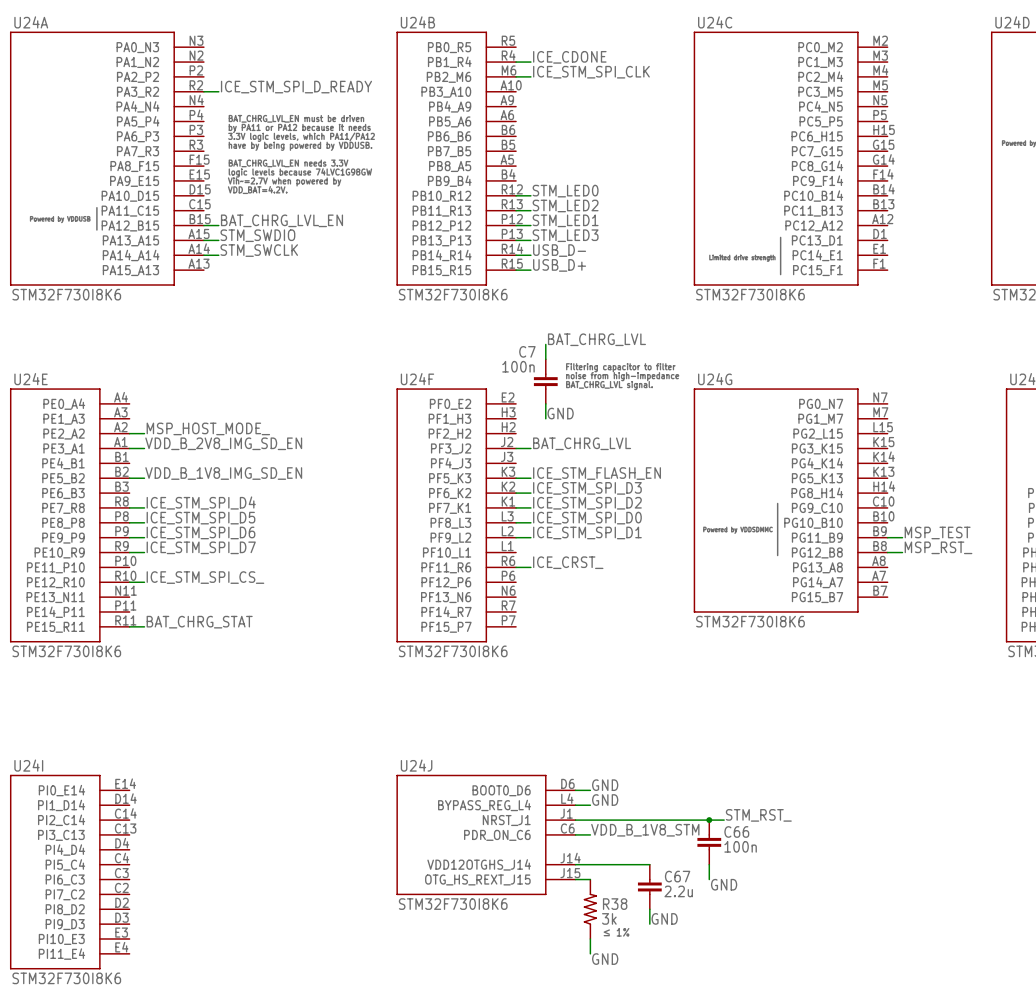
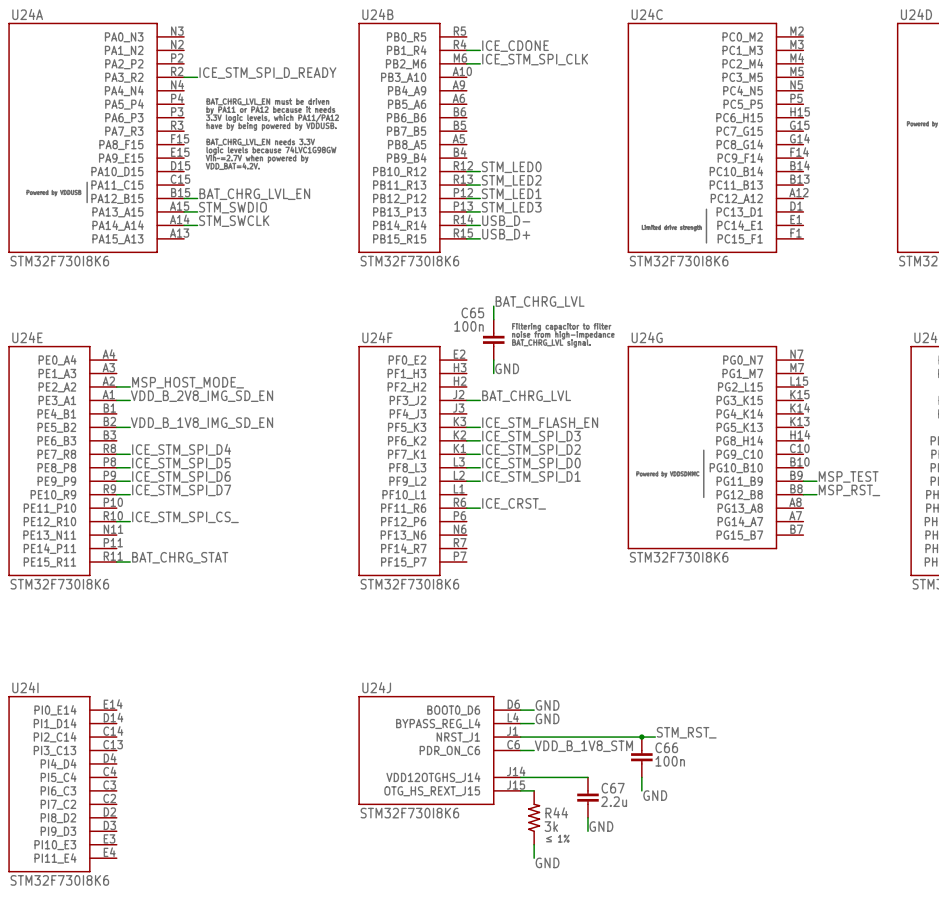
C7 name: C7 (527, 351) -> C65 (472, 312)
R38 name: R38 (615, 904) -> R44 (556, 812)

